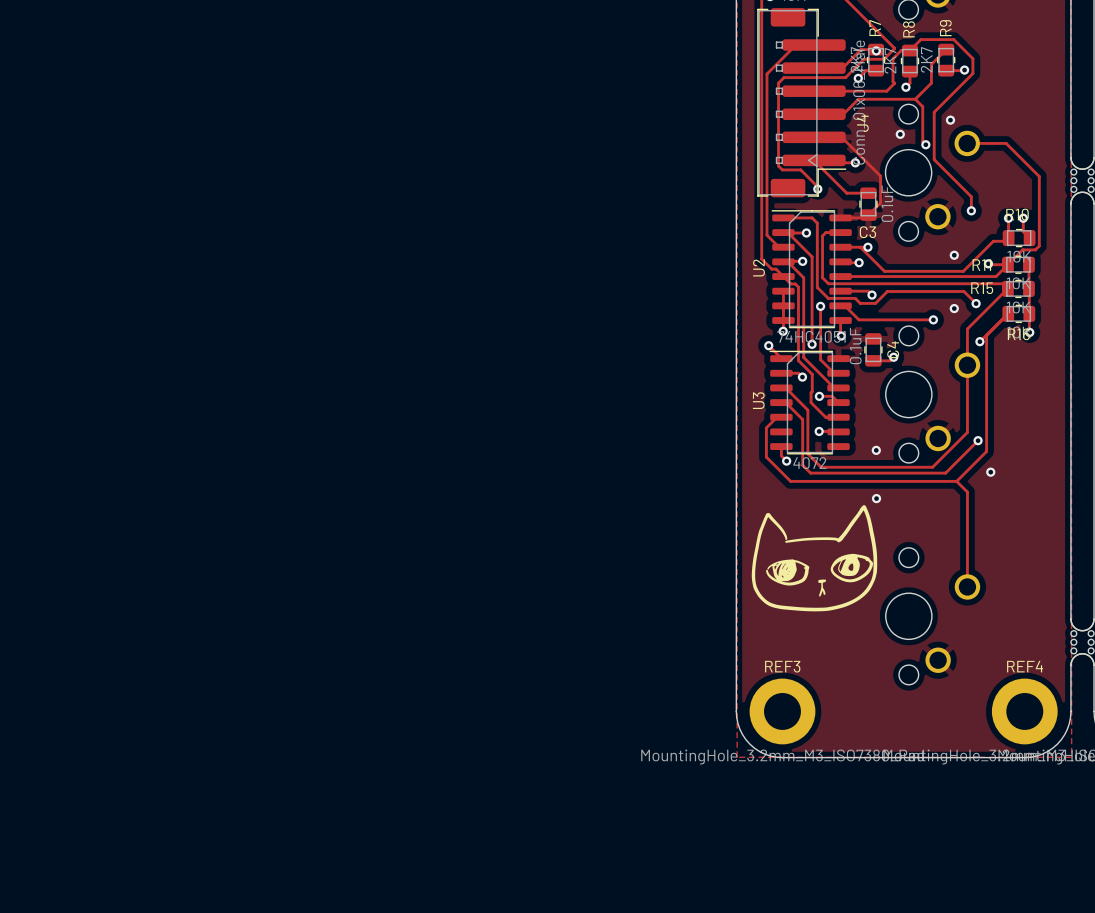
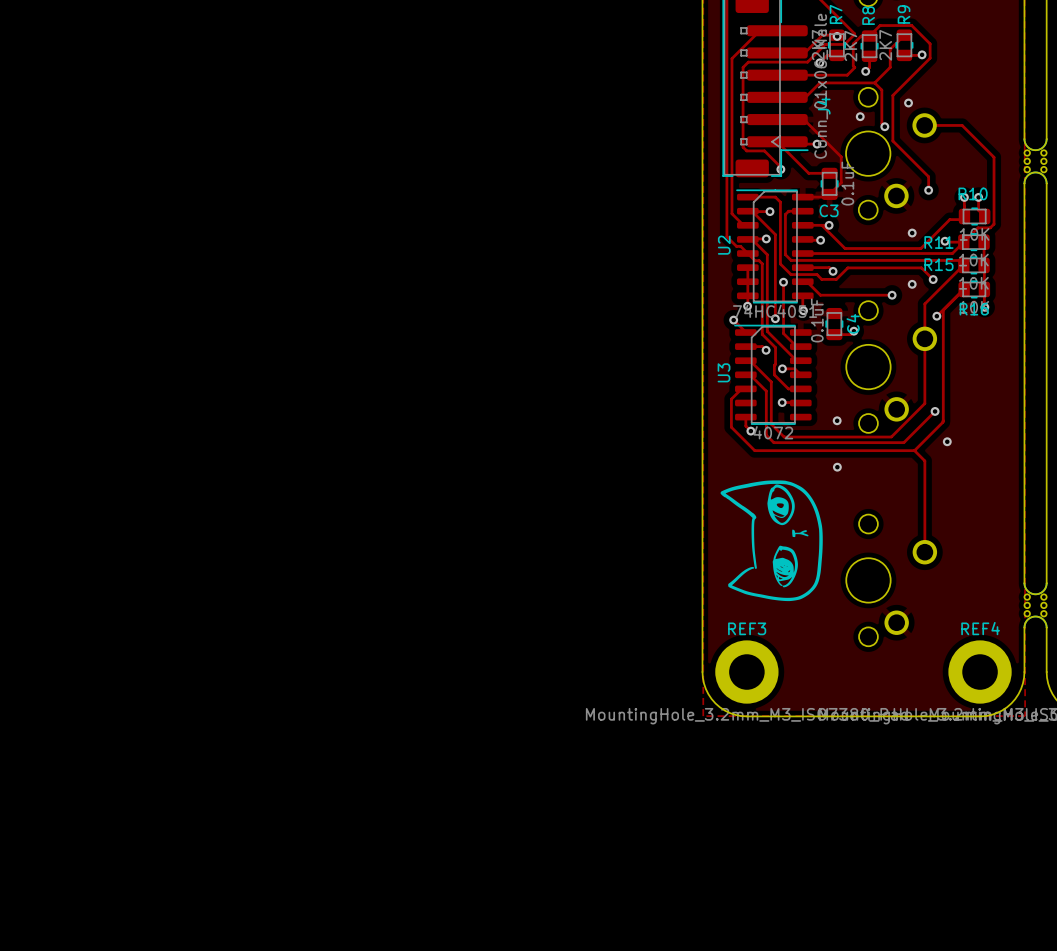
drawing: [751, 505, 878, 612] -> none
drawing: none -> [720, 480, 823, 602]

